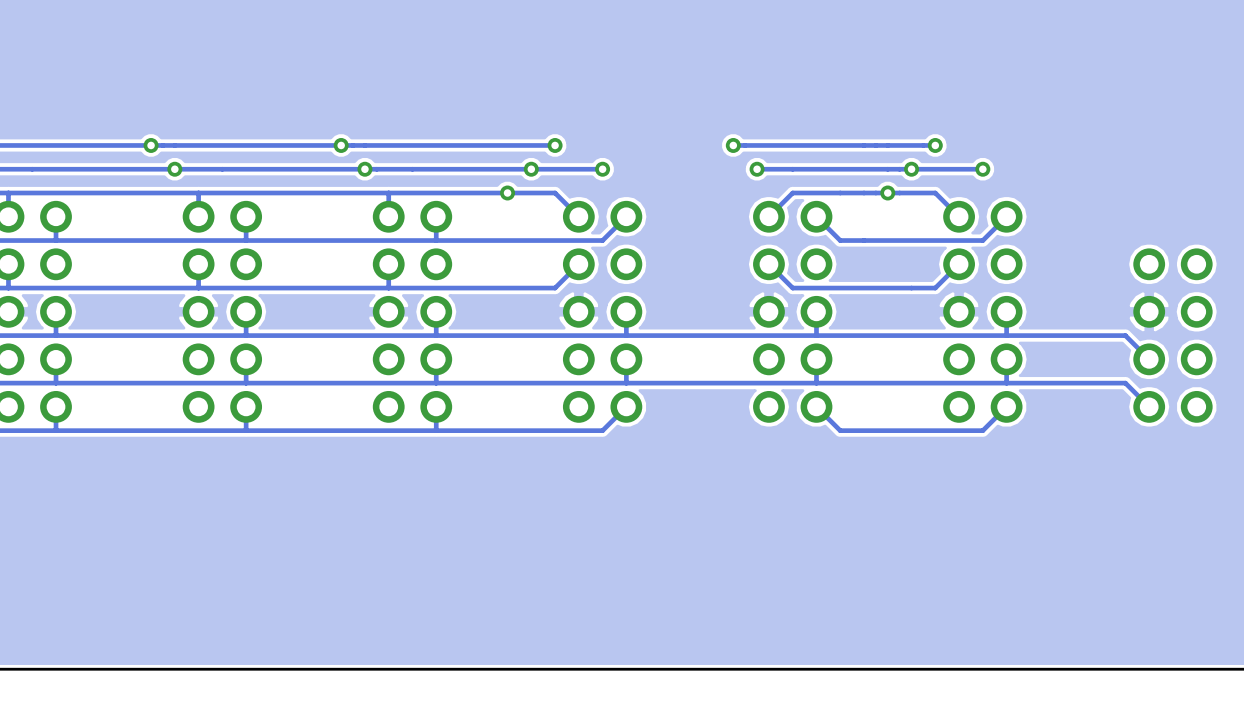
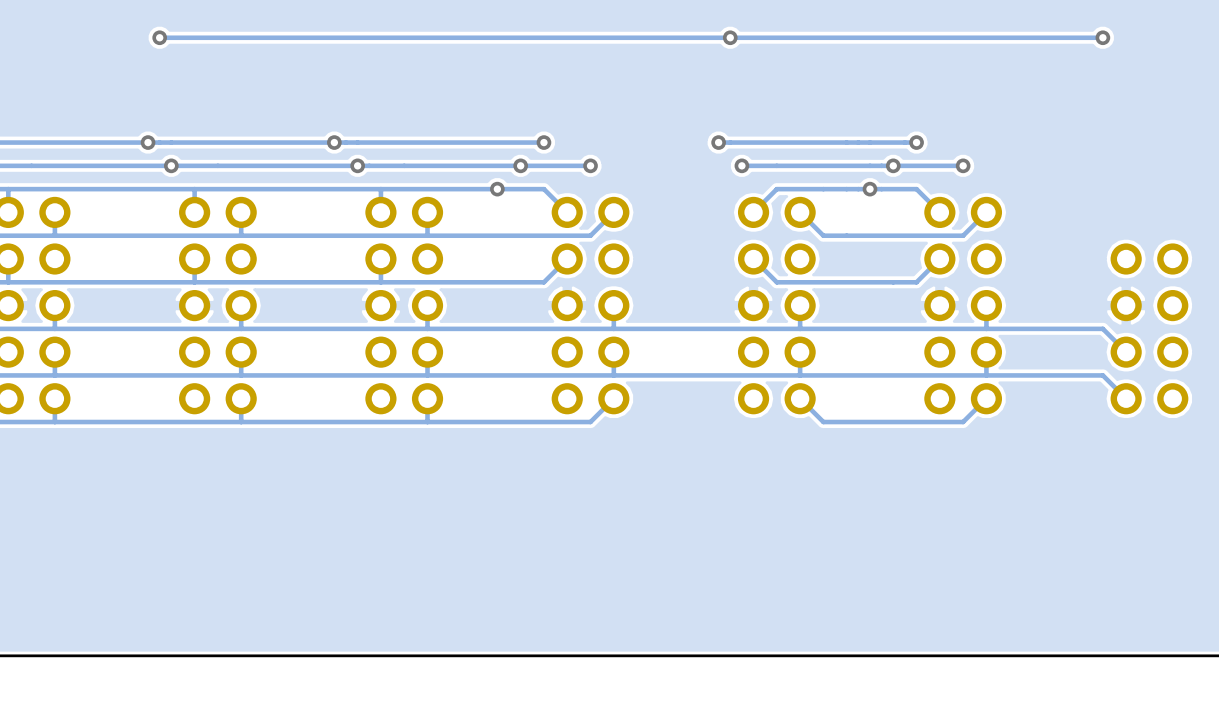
via: none -> (159, 37)
via: none -> (730, 37)
track: none -> (1102, 37) (159, 37)
via: none -> (1102, 37)

